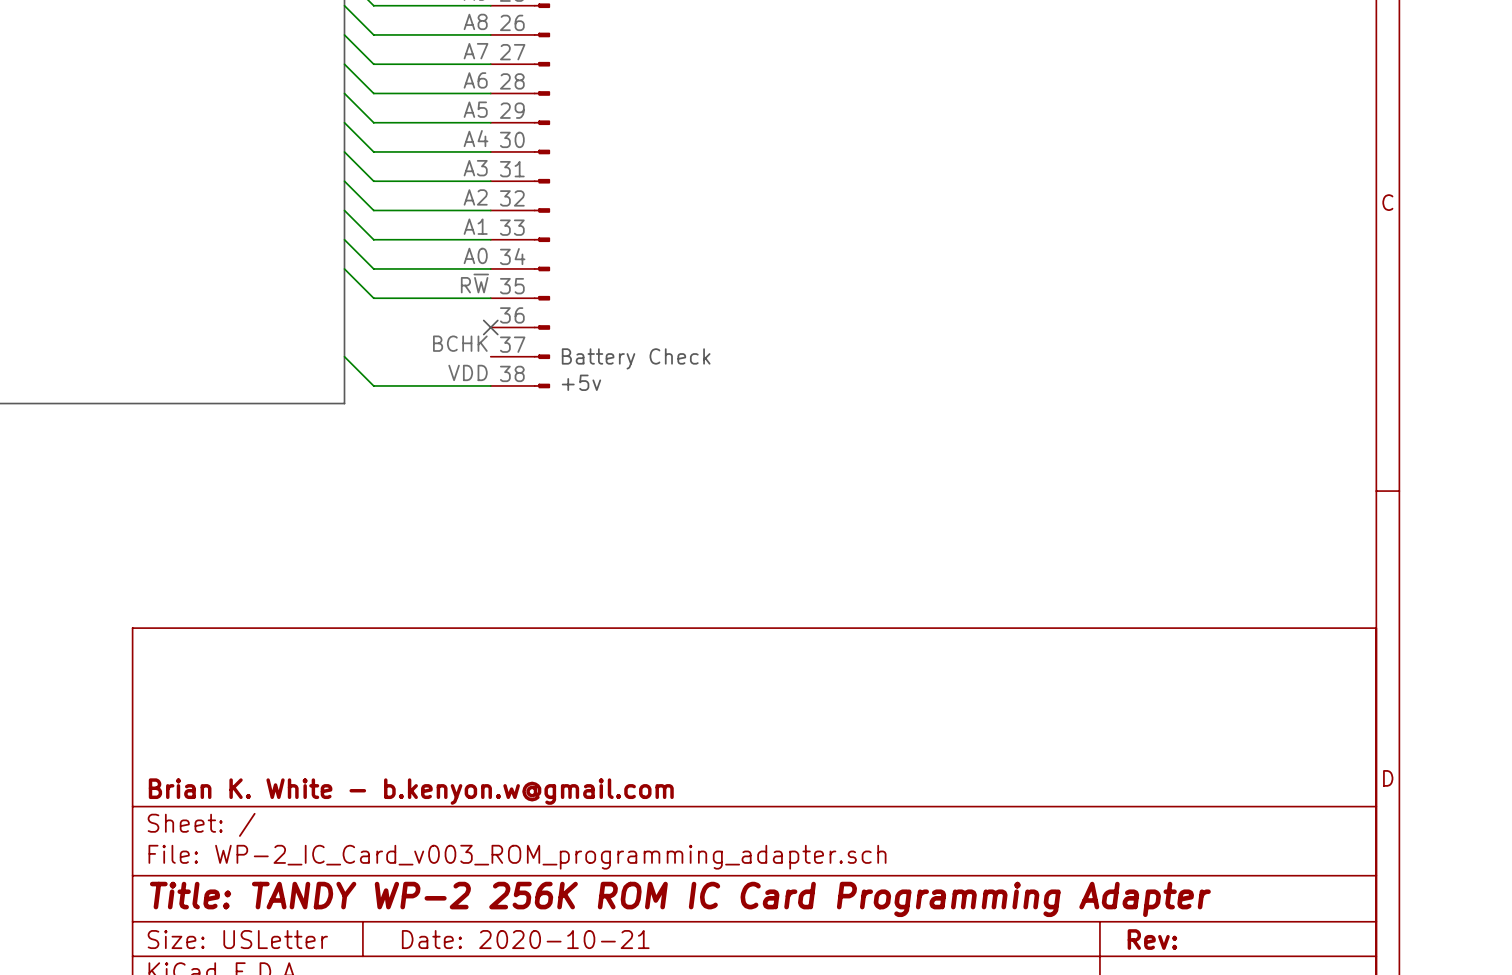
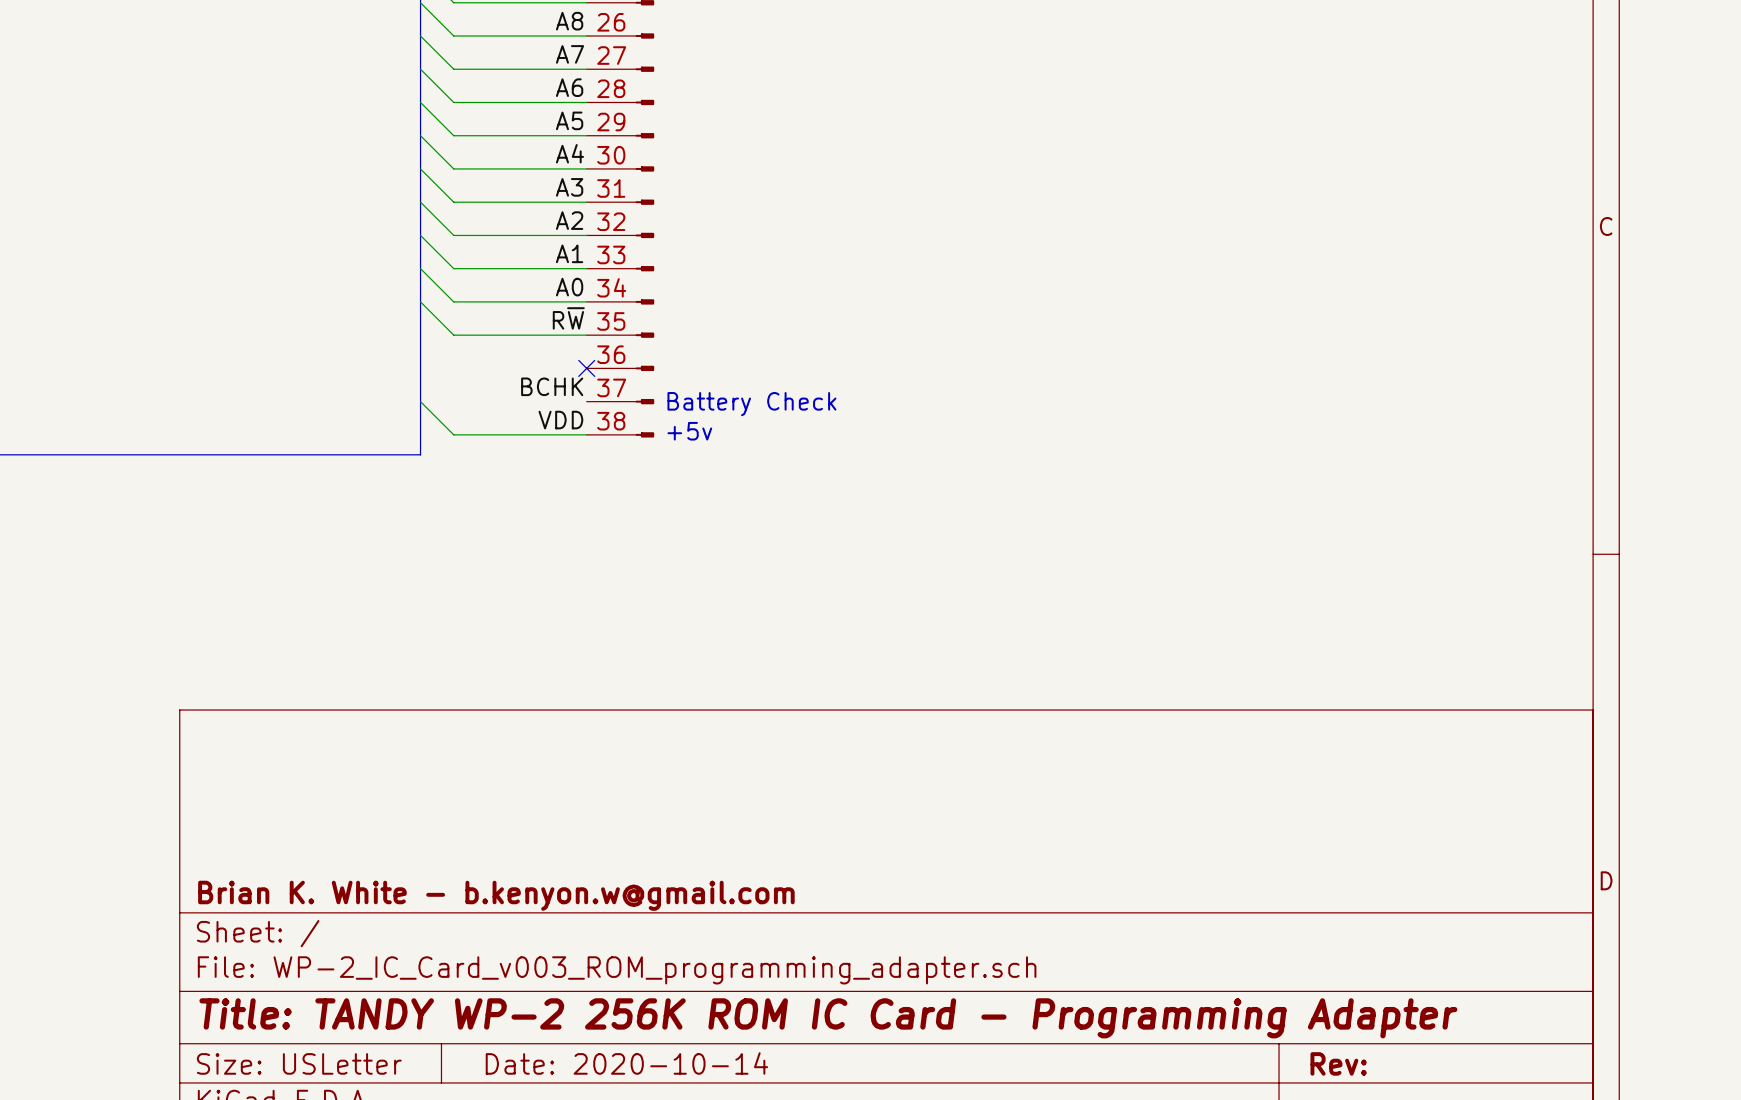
title block: Title: TANDY WP-2 256K ROM IC Card Programming Adapter (680, 899) -> Title: TANDY WP-2 256K ROM IC Card - Programming Adapter (828, 1018)
title block: Date: 2020-10-21 (525, 939) -> Date: 2020-10-14 (626, 1063)

